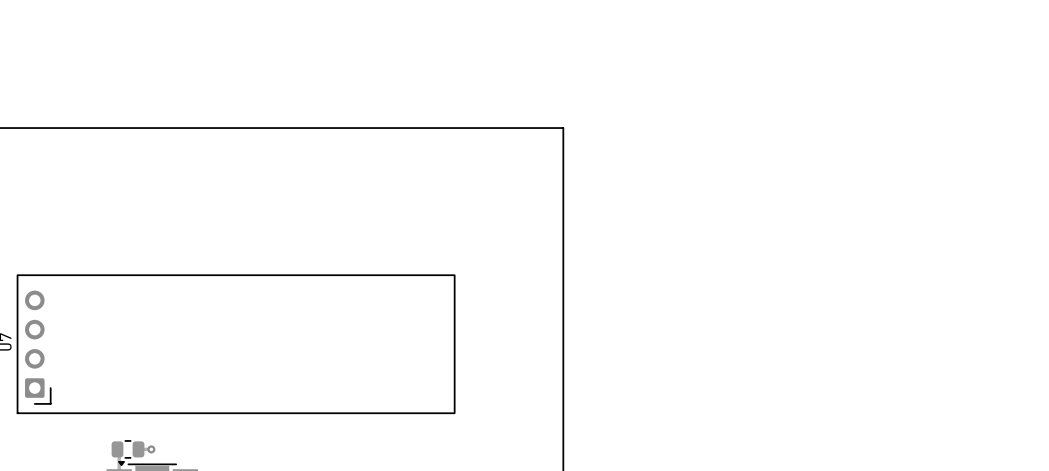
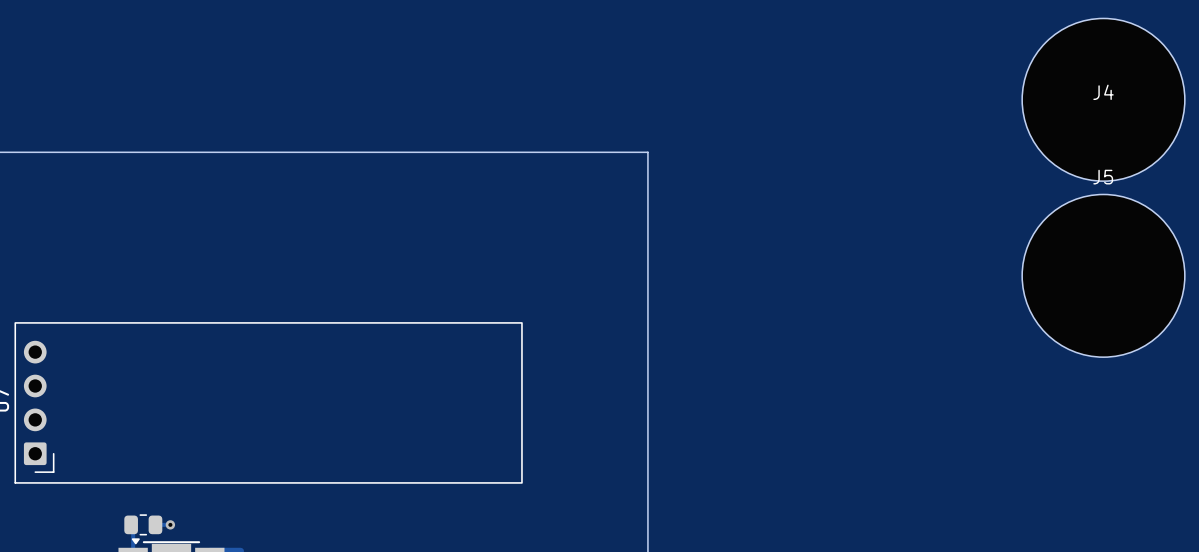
J4: none -> (1103, 99)
J5: none -> (1103, 275)

